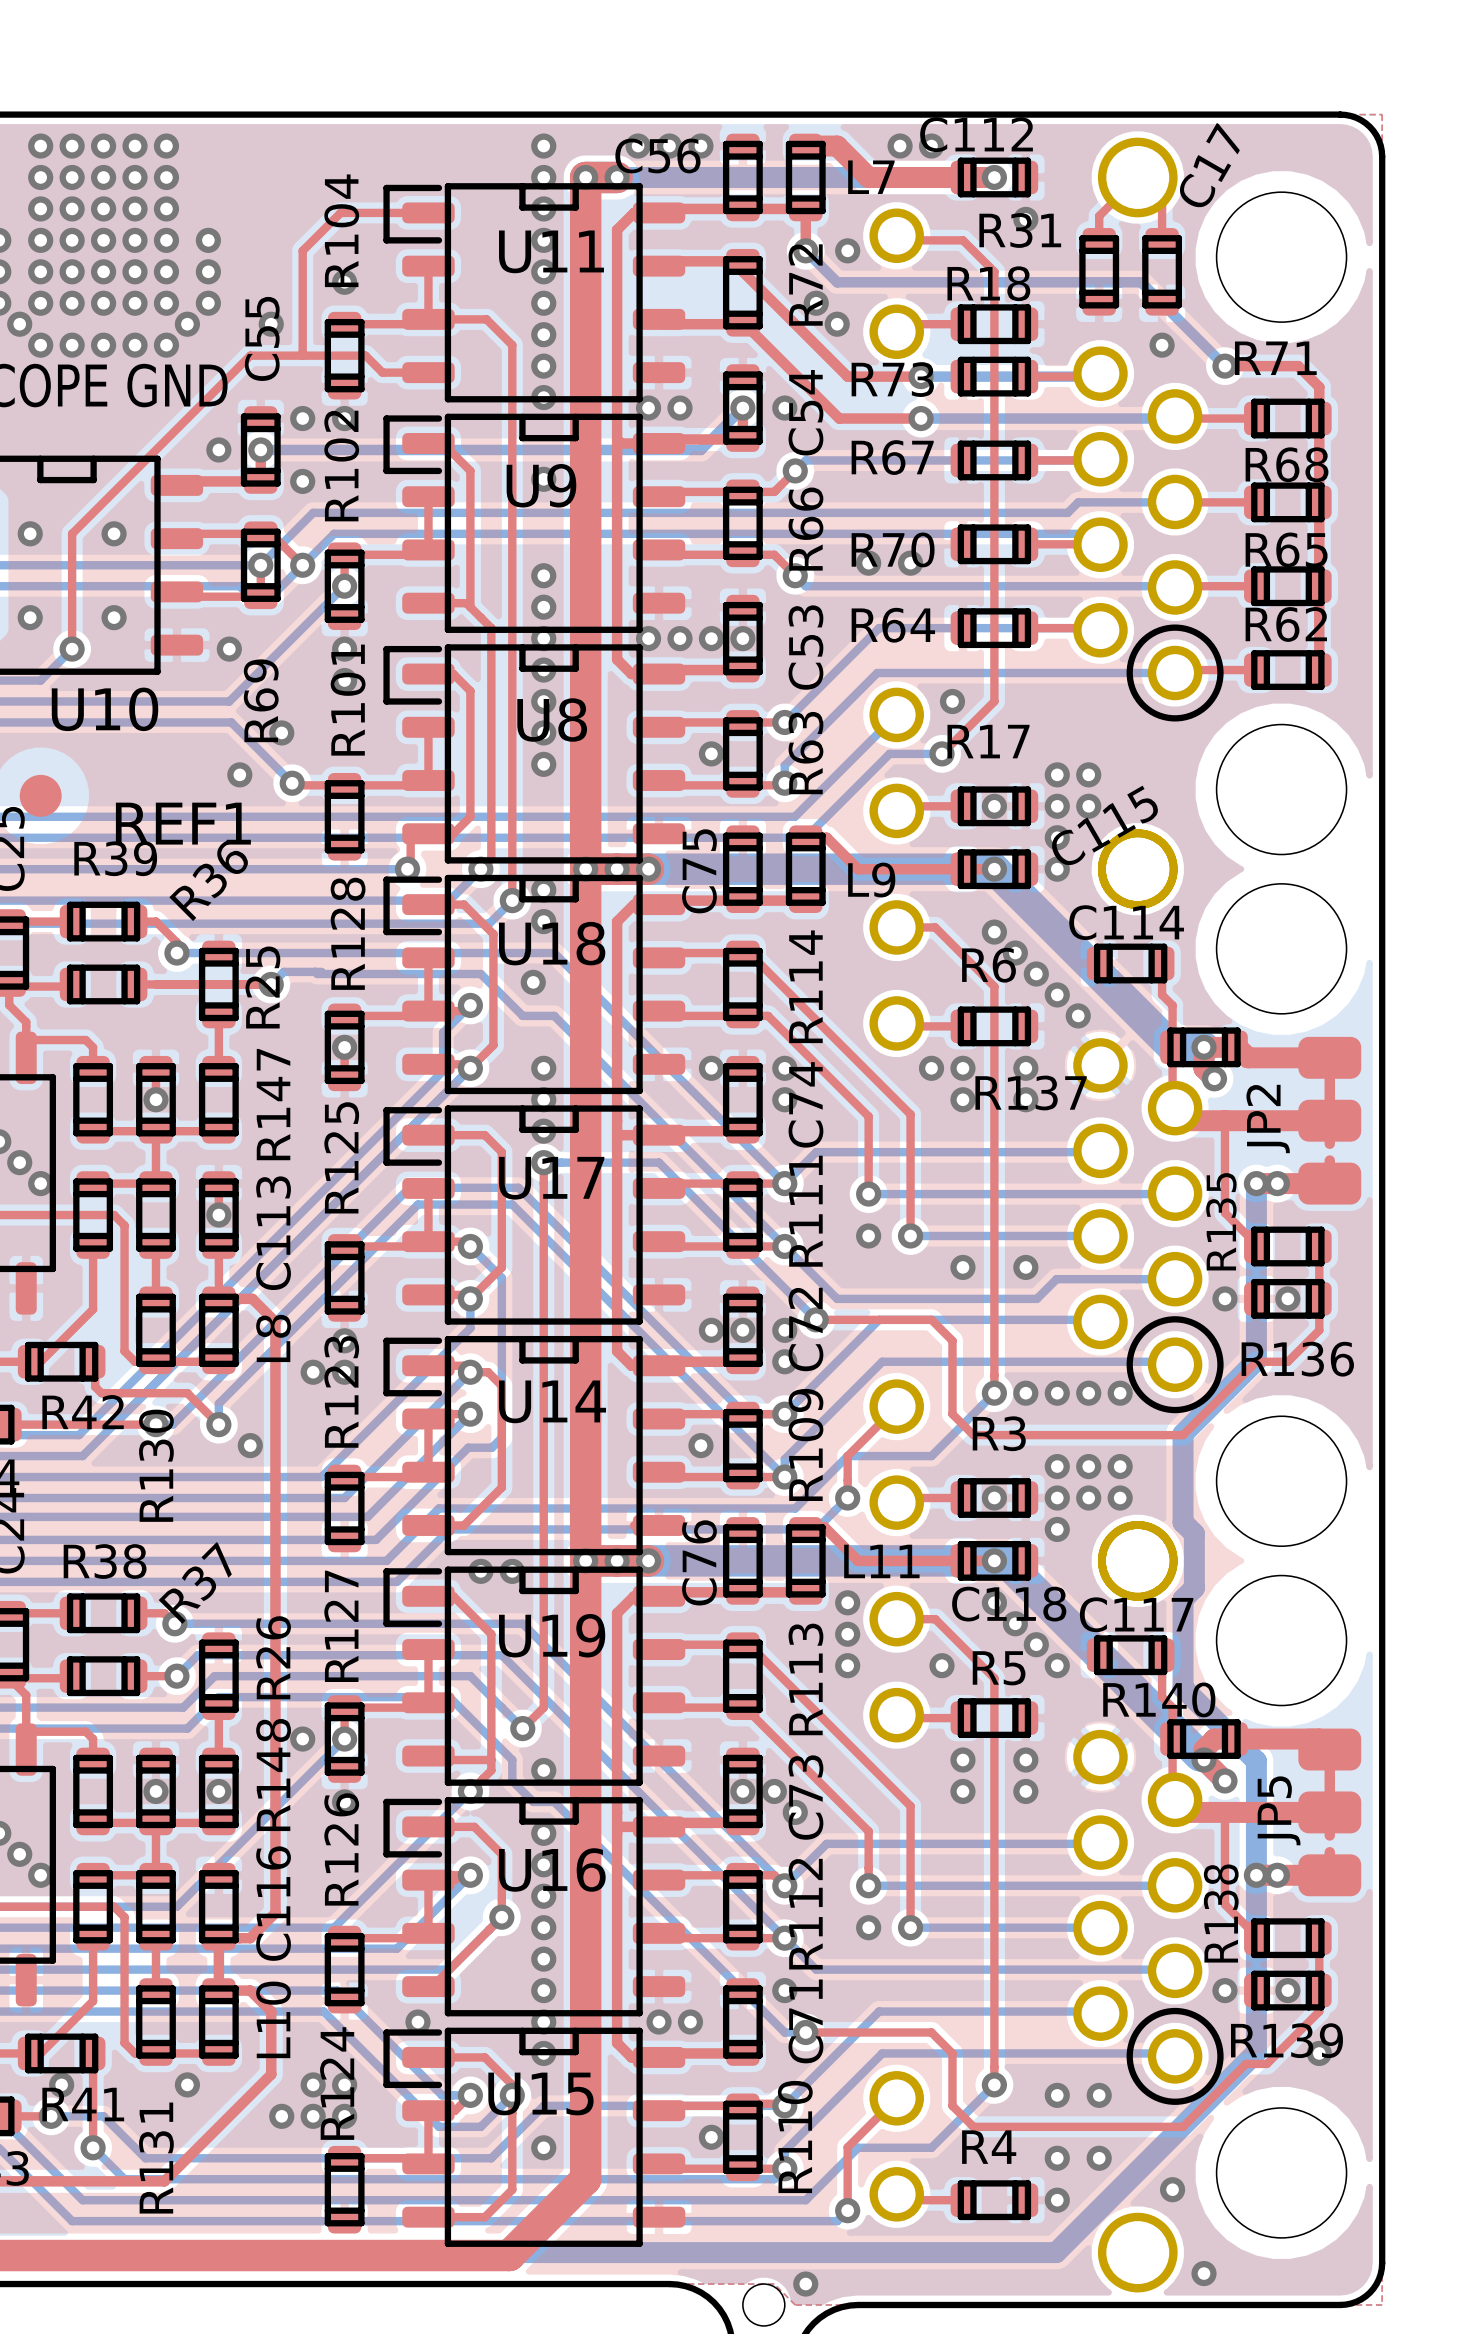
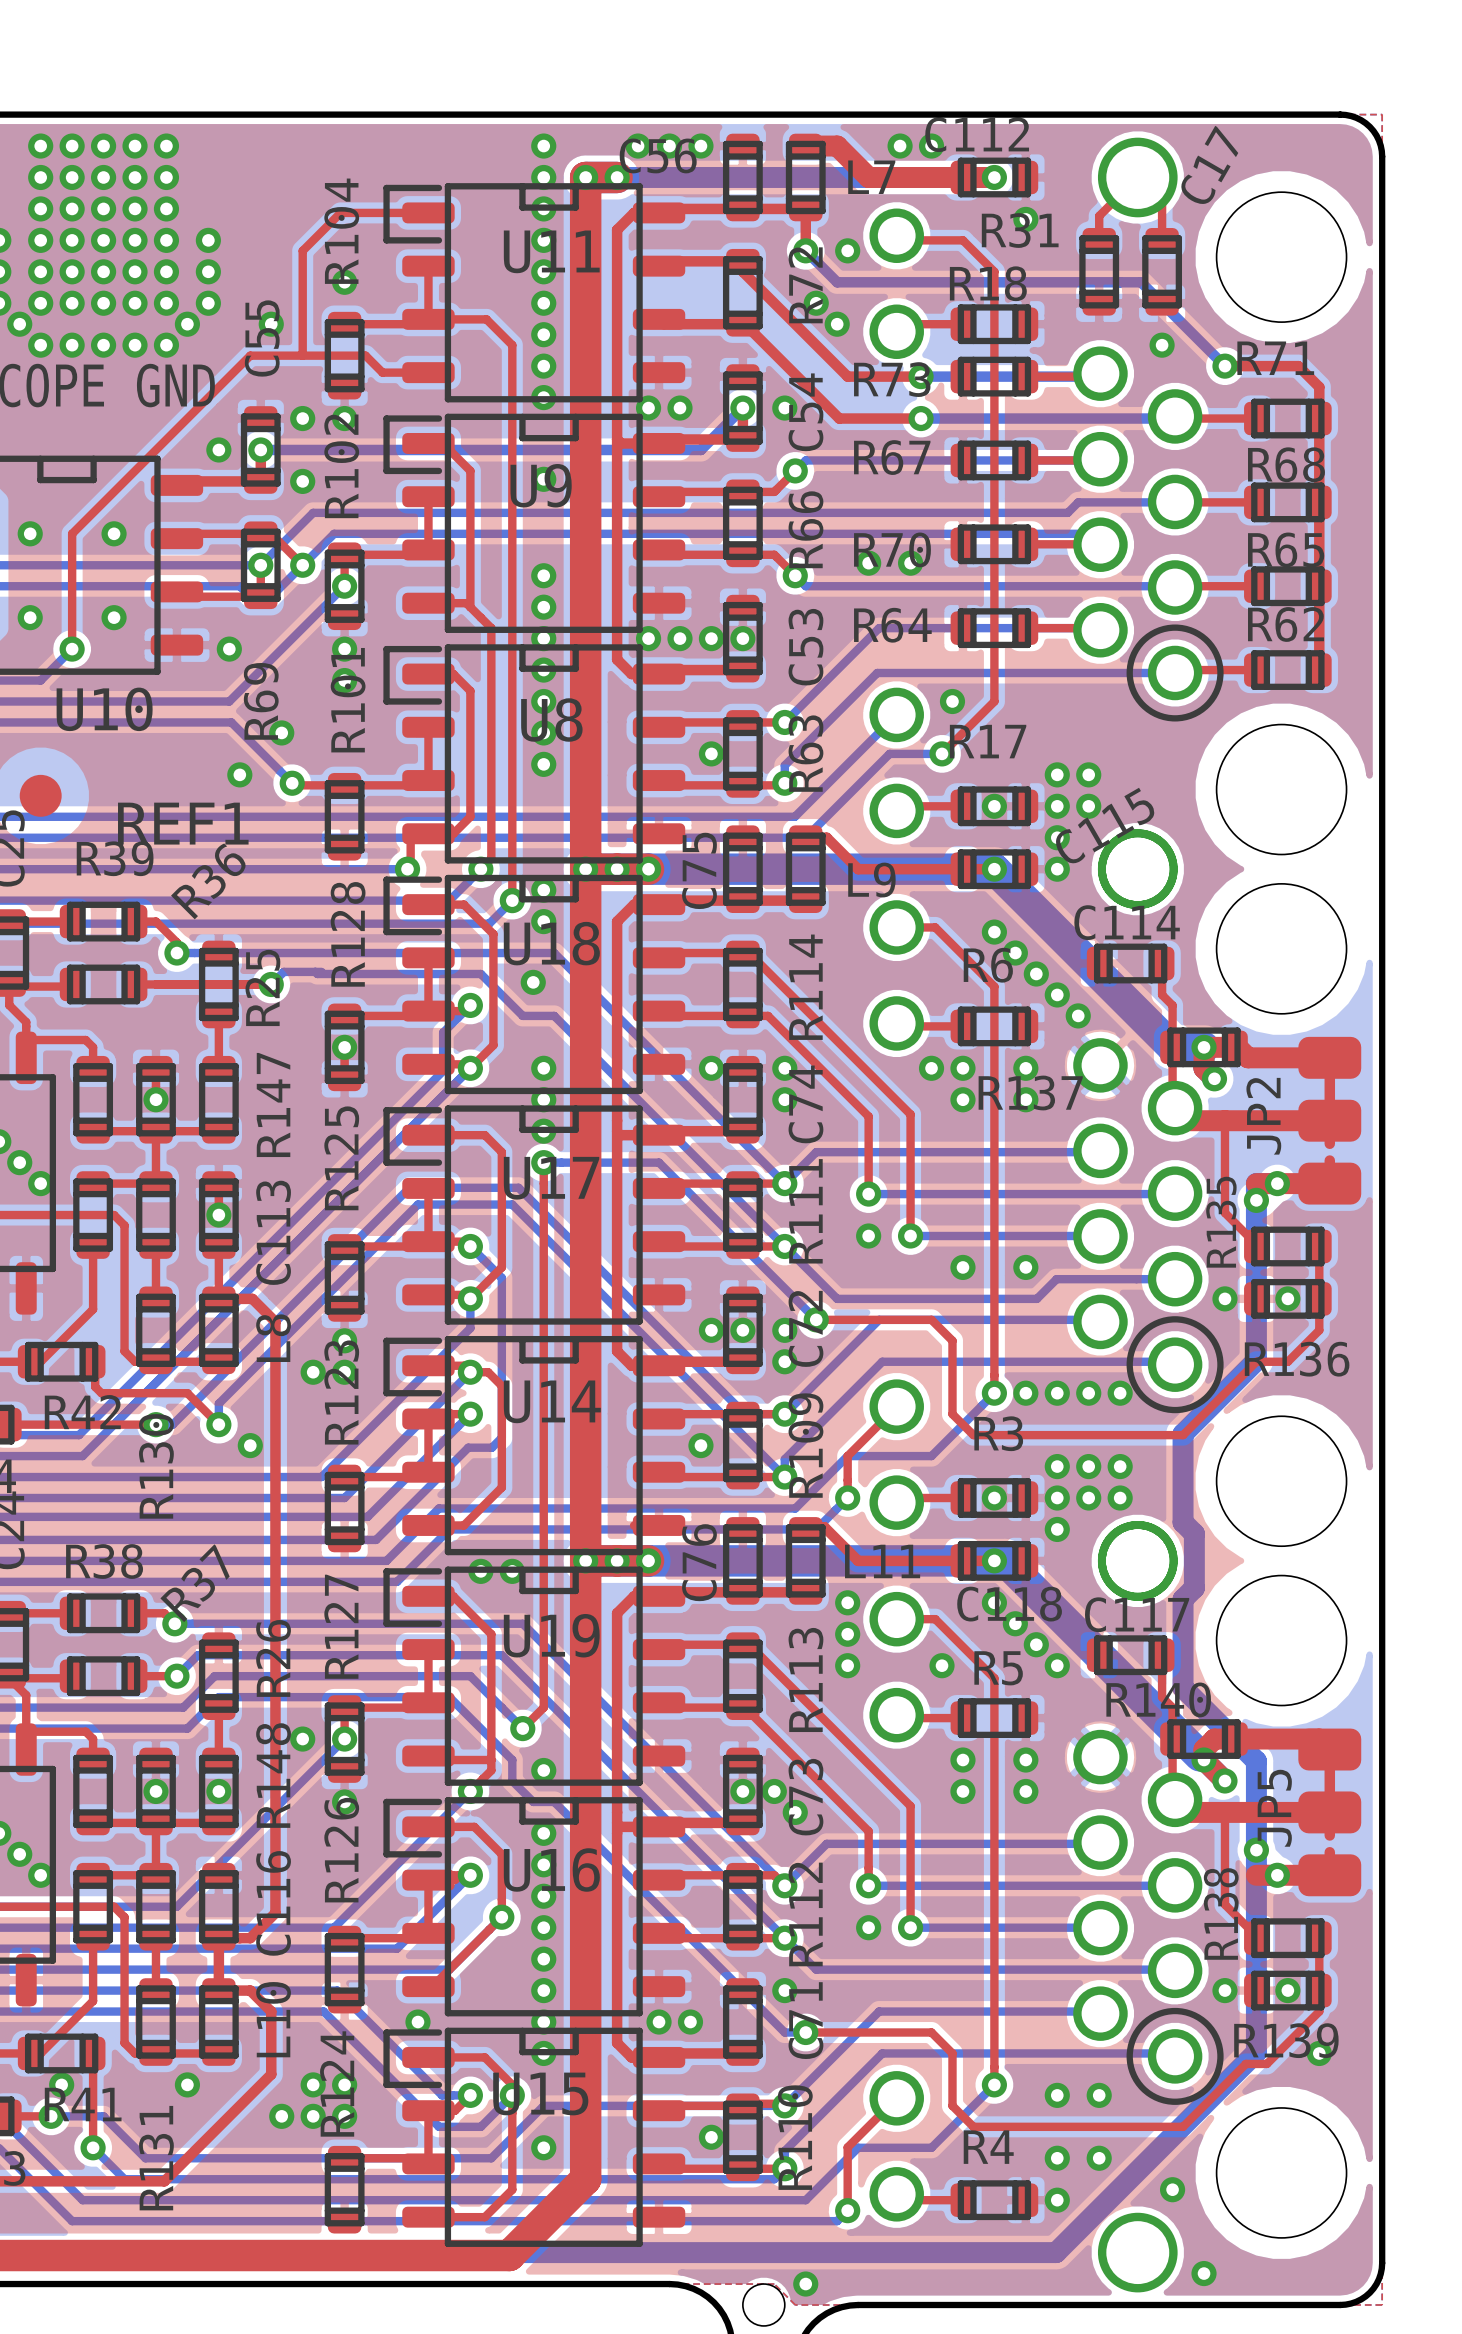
via position: (1256, 1183) -> (1256, 1200)
via position: (1256, 1875) -> (1256, 1850)

